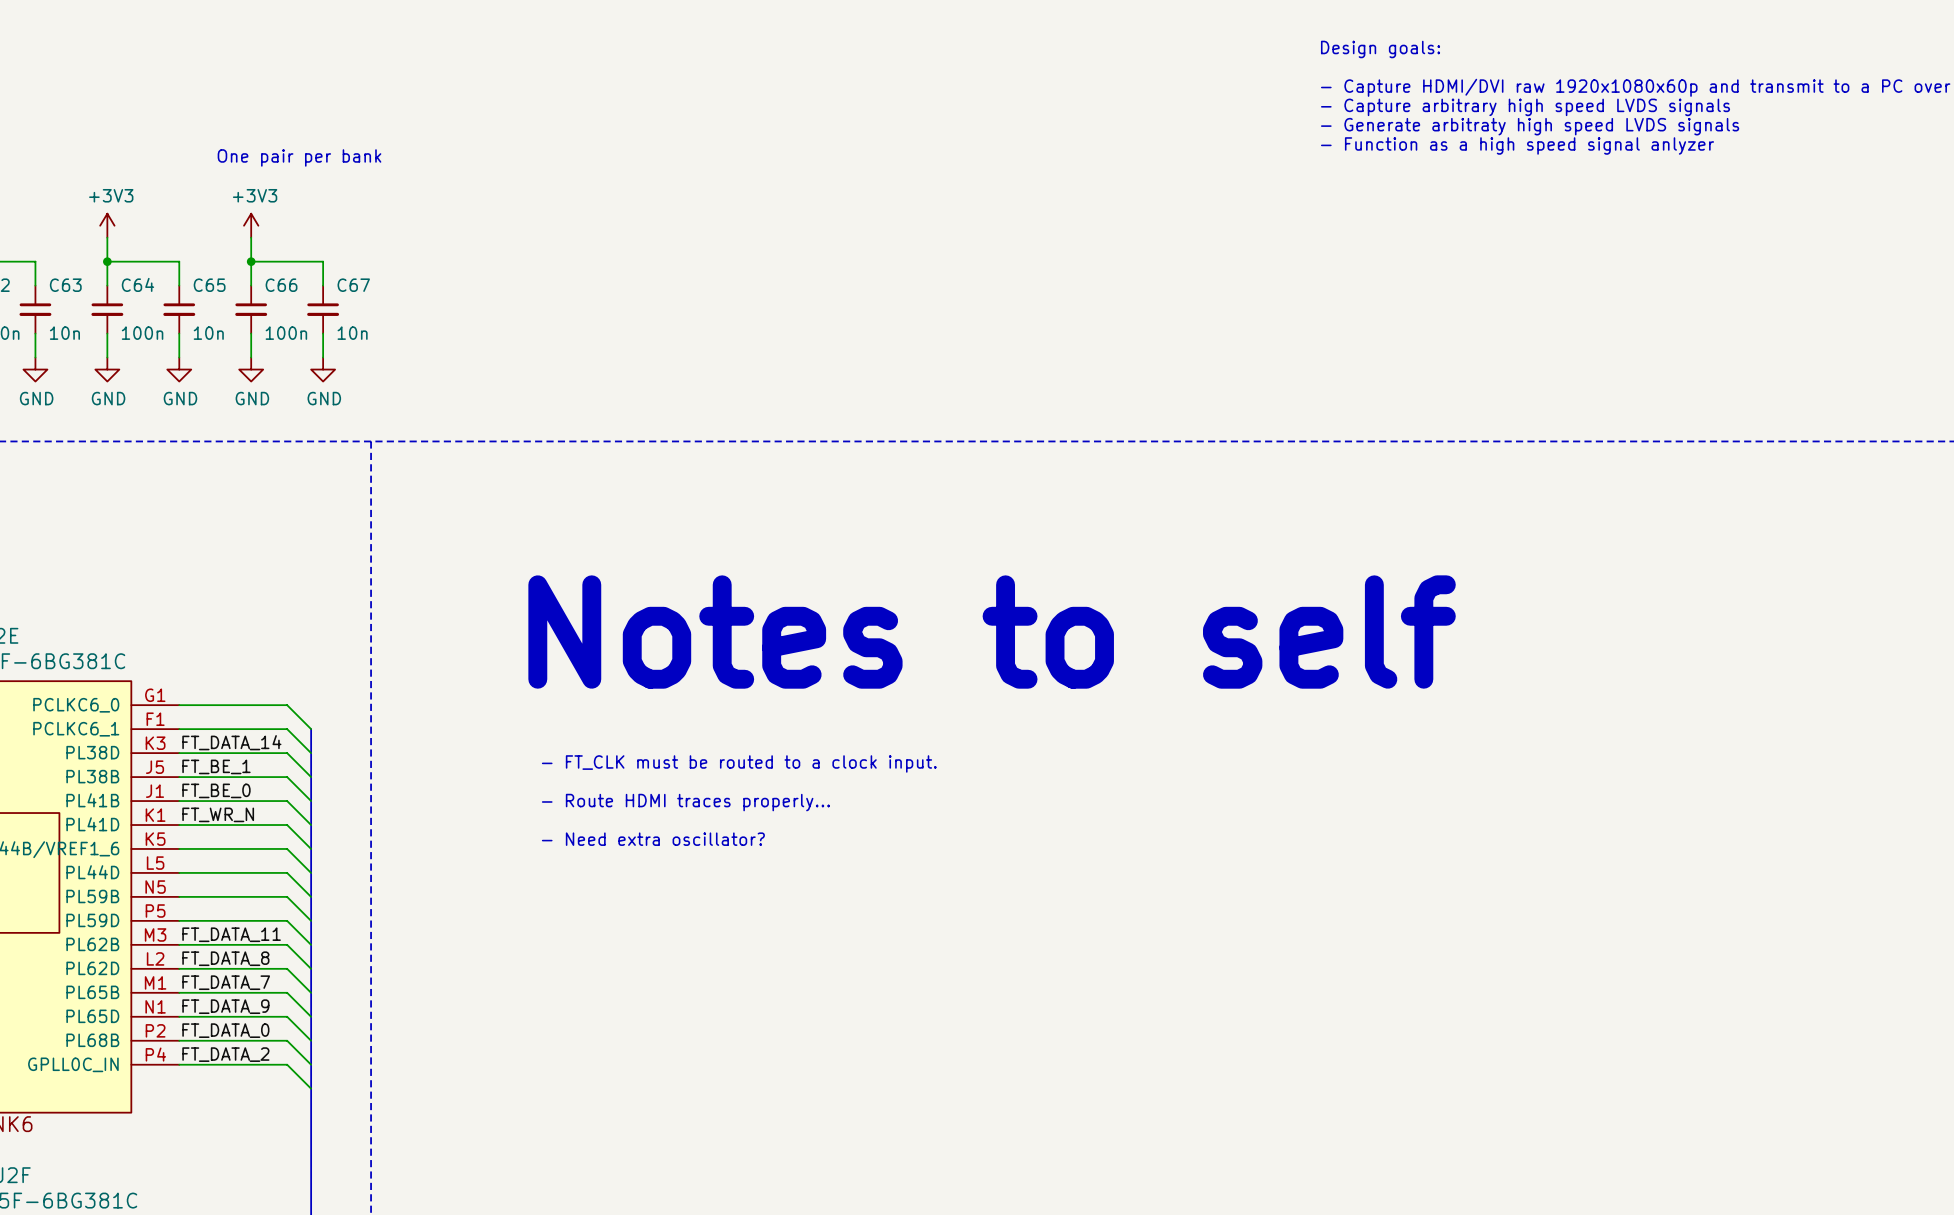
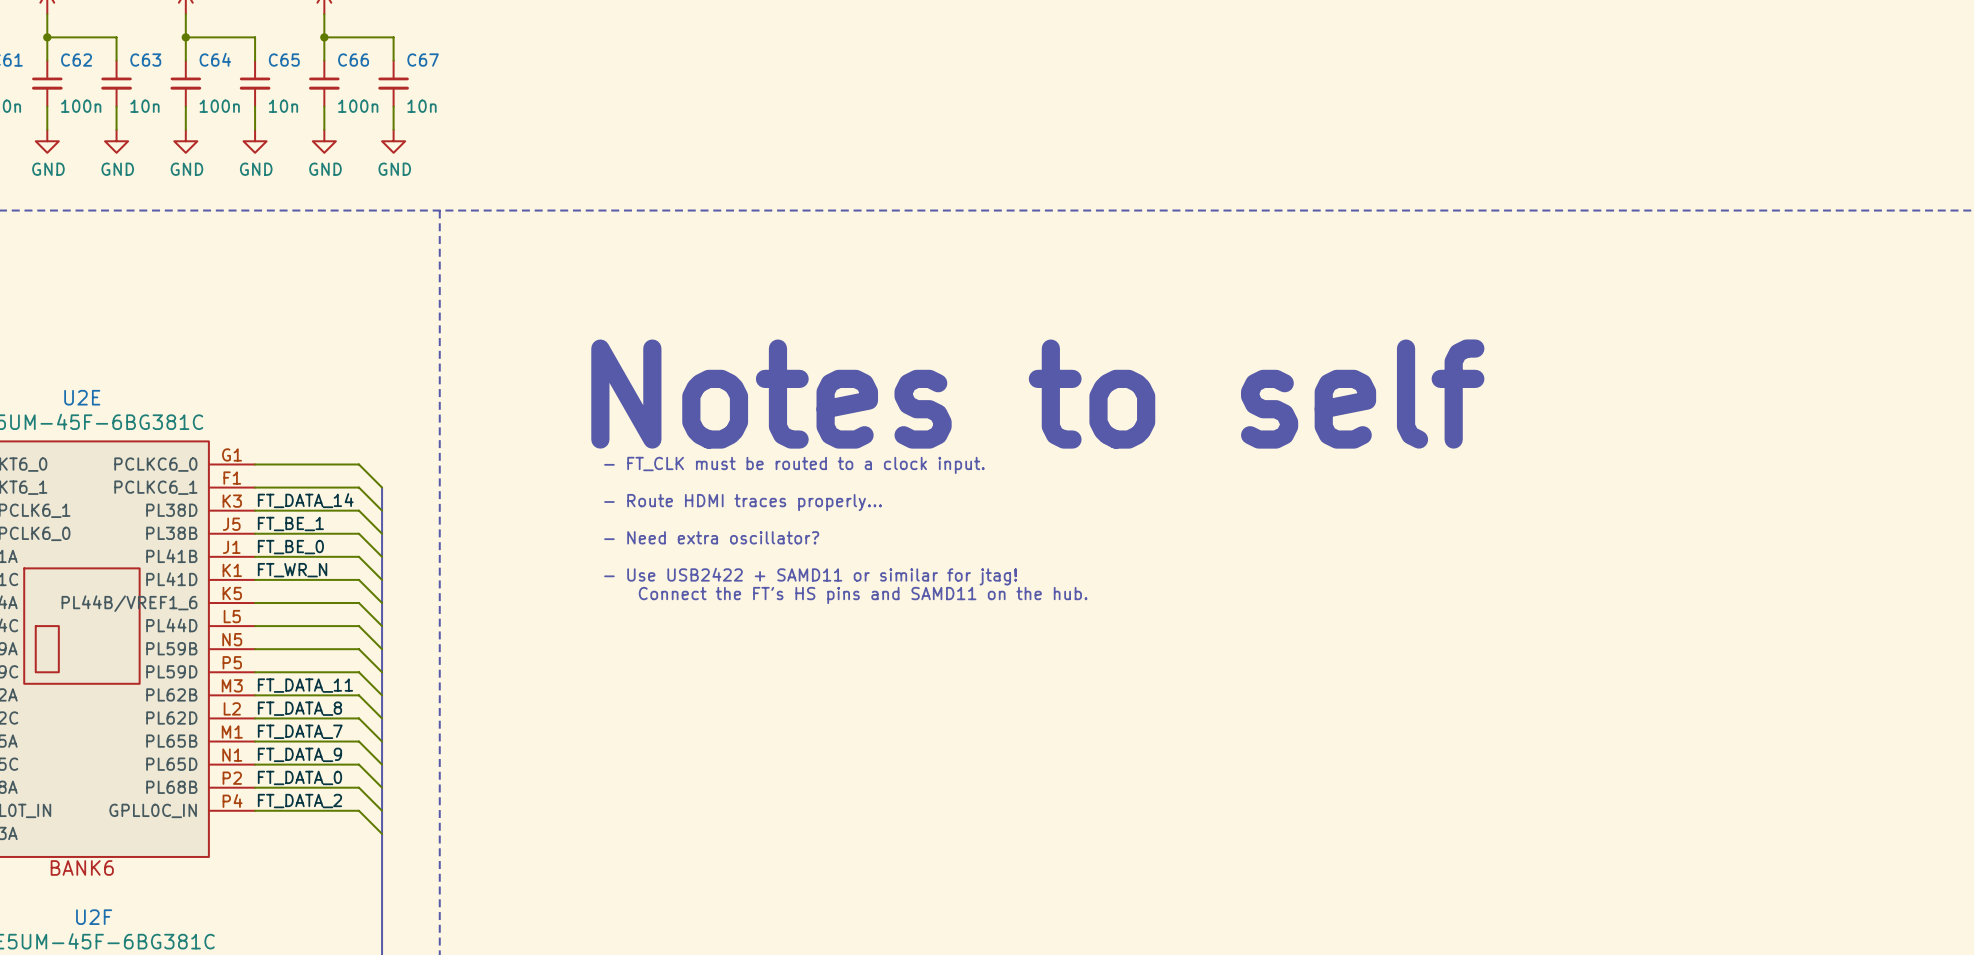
text position: - FT_CLK must be routed to a clock input. (739, 763) -> - FT_CLK must be routed to a clock input. (794, 465)
text: none -> - Need extra oscillator? (711, 537)
text position: - Route HDMI traces properly... (685, 802) -> - Route HDMI traces properly... (743, 502)
text: none -> - Use USB2422 + SAMD11 or similar for jtag! (810, 576)
text: - Need extra oscillator? (653, 839) -> Connect the FT's HS pins and SAMD11 on the hub. (863, 595)

